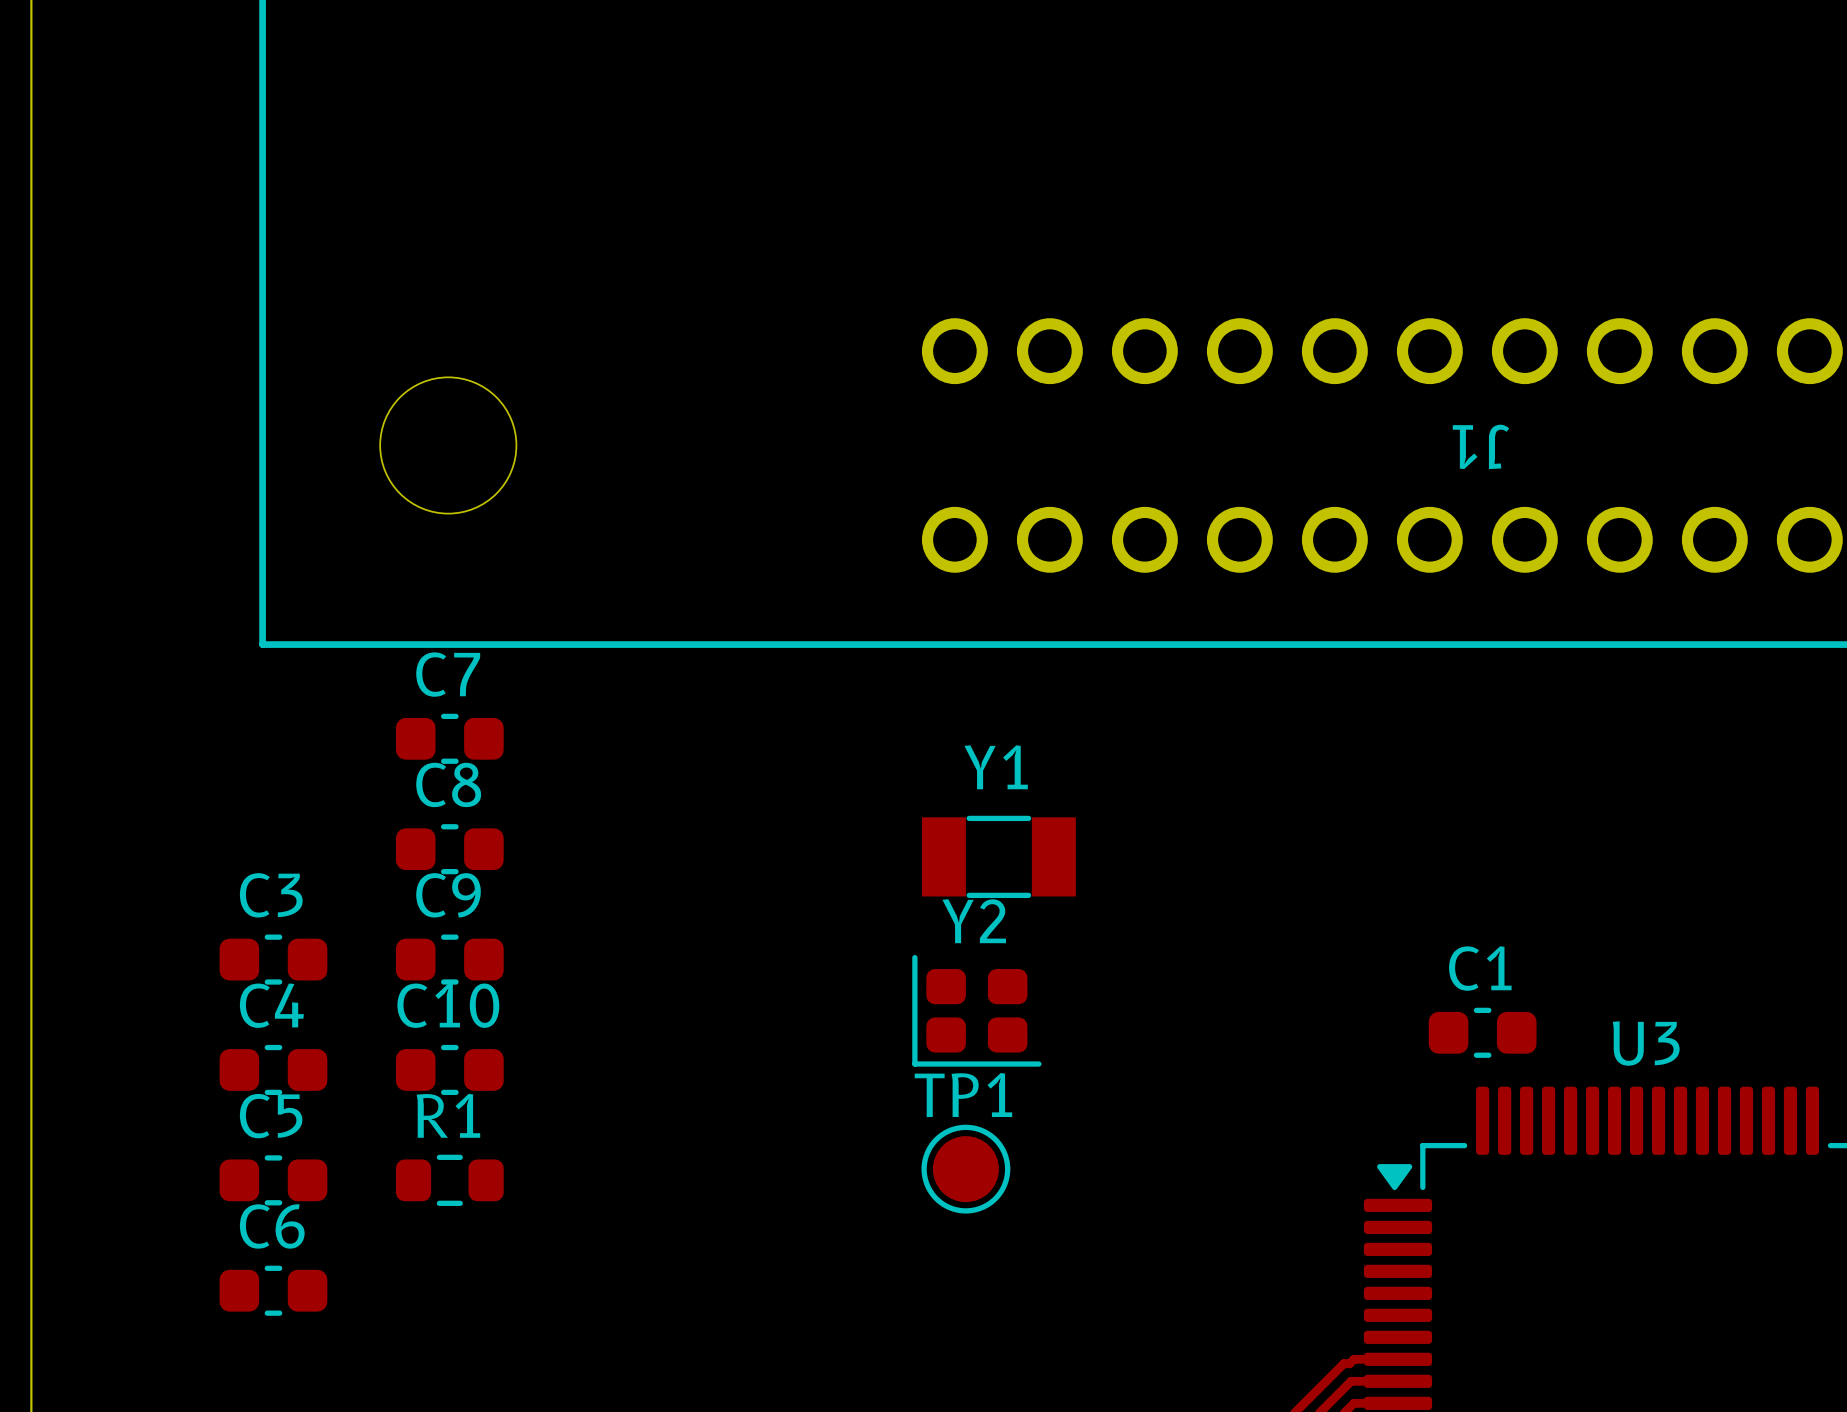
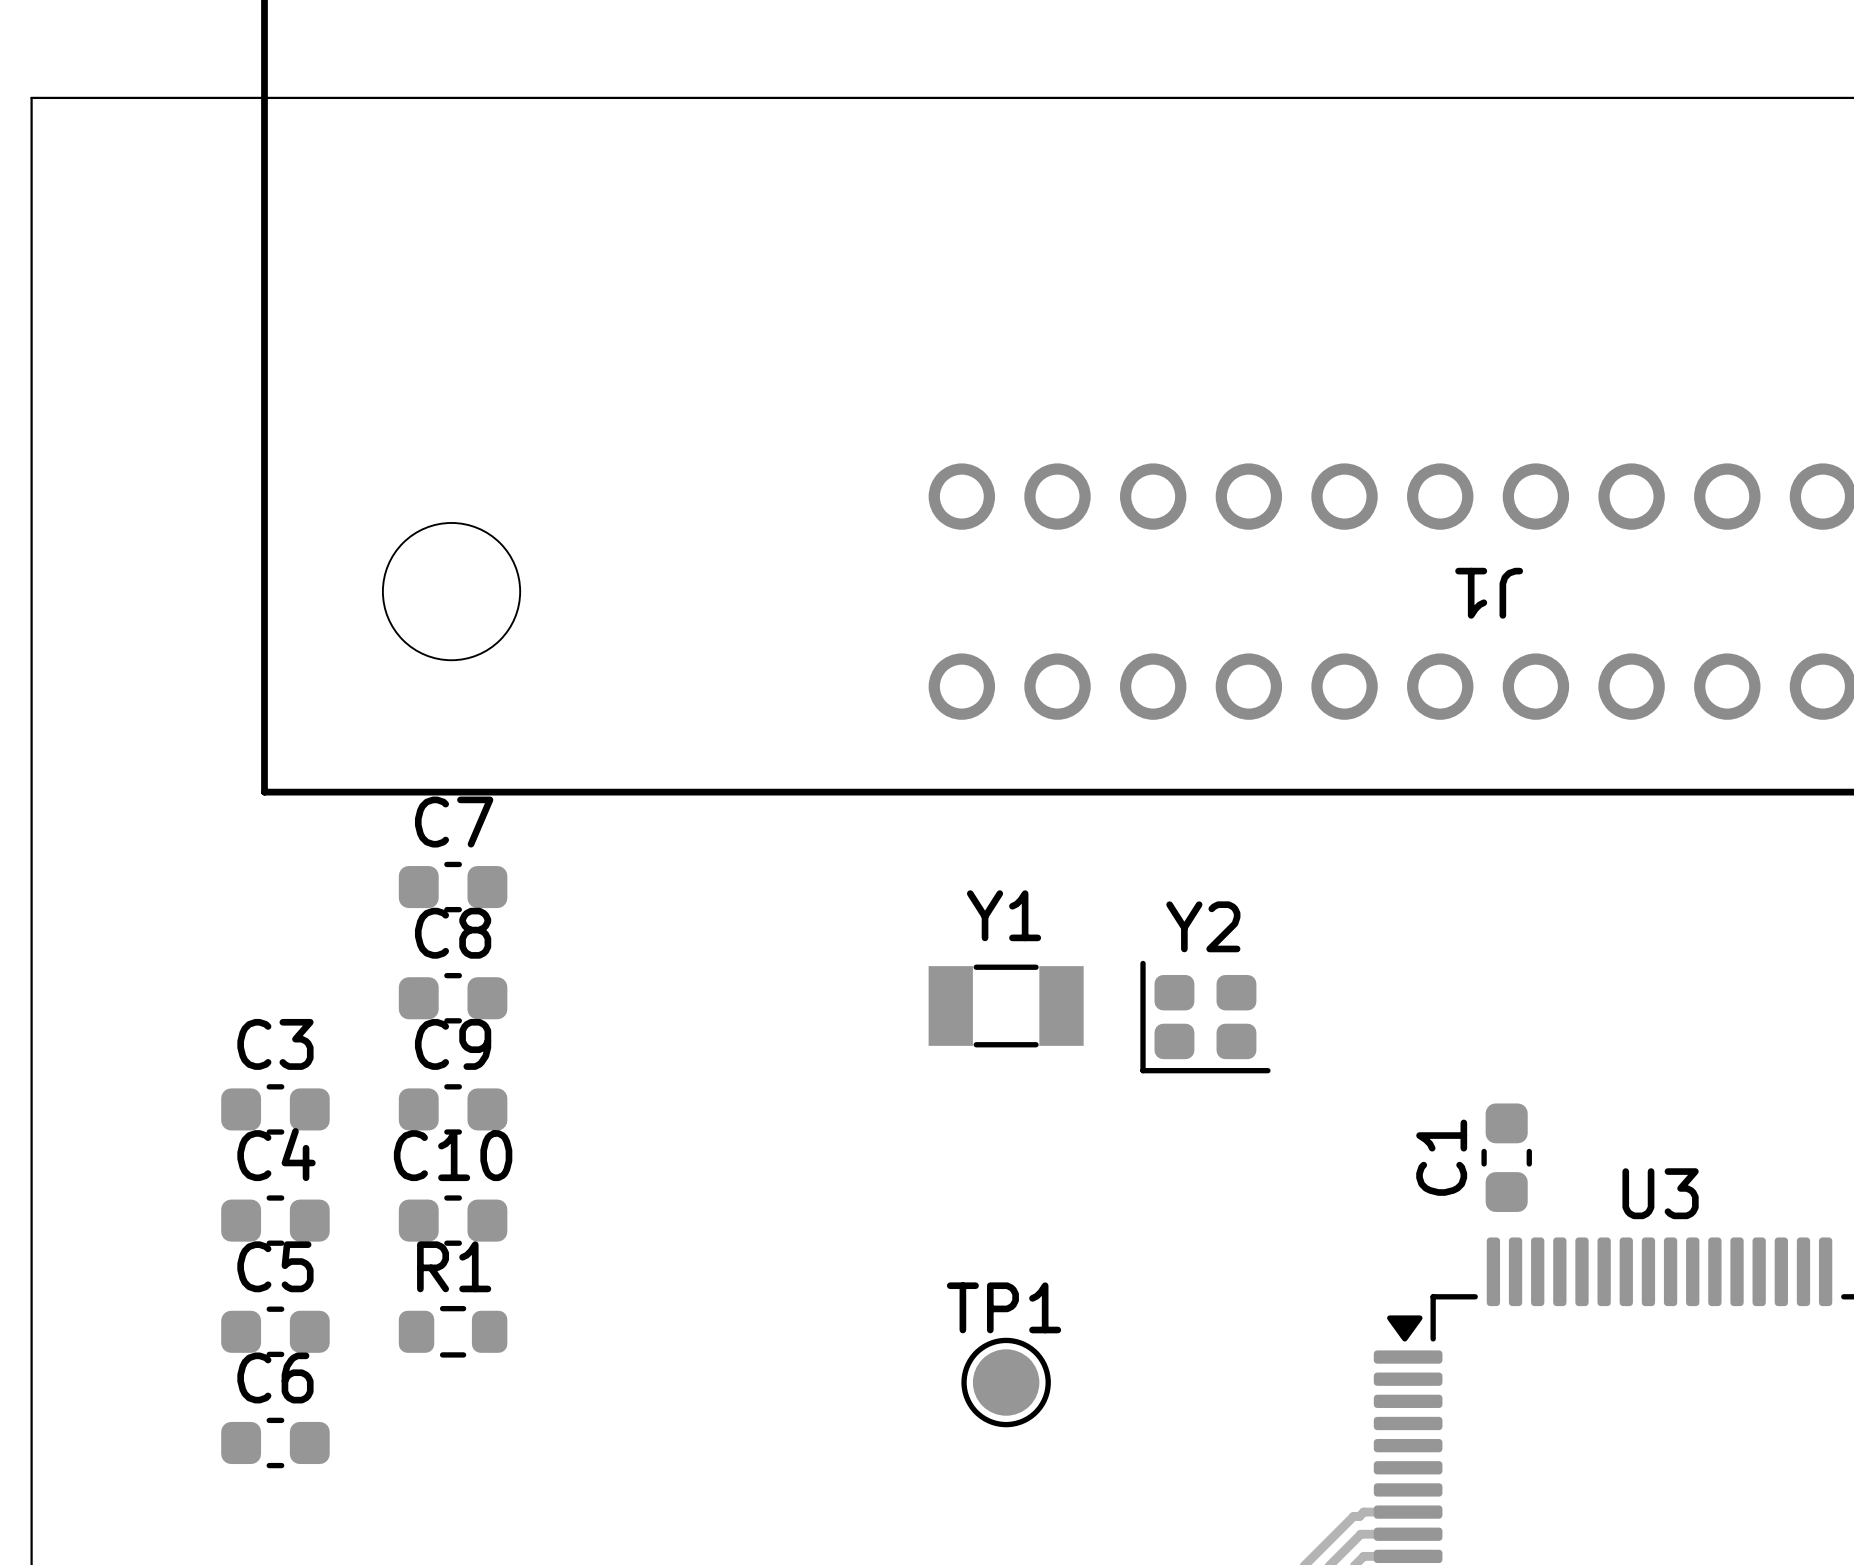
C1 name position: C1 (1480, 968) -> C1 (1441, 1157)
Y2 position: (976, 1010) -> (1205, 1017)
C1 rotation: 0° (1482, 1032) -> 90° clockwise (1506, 1157)
TP1 position: (965, 1169) -> (1006, 1382)

